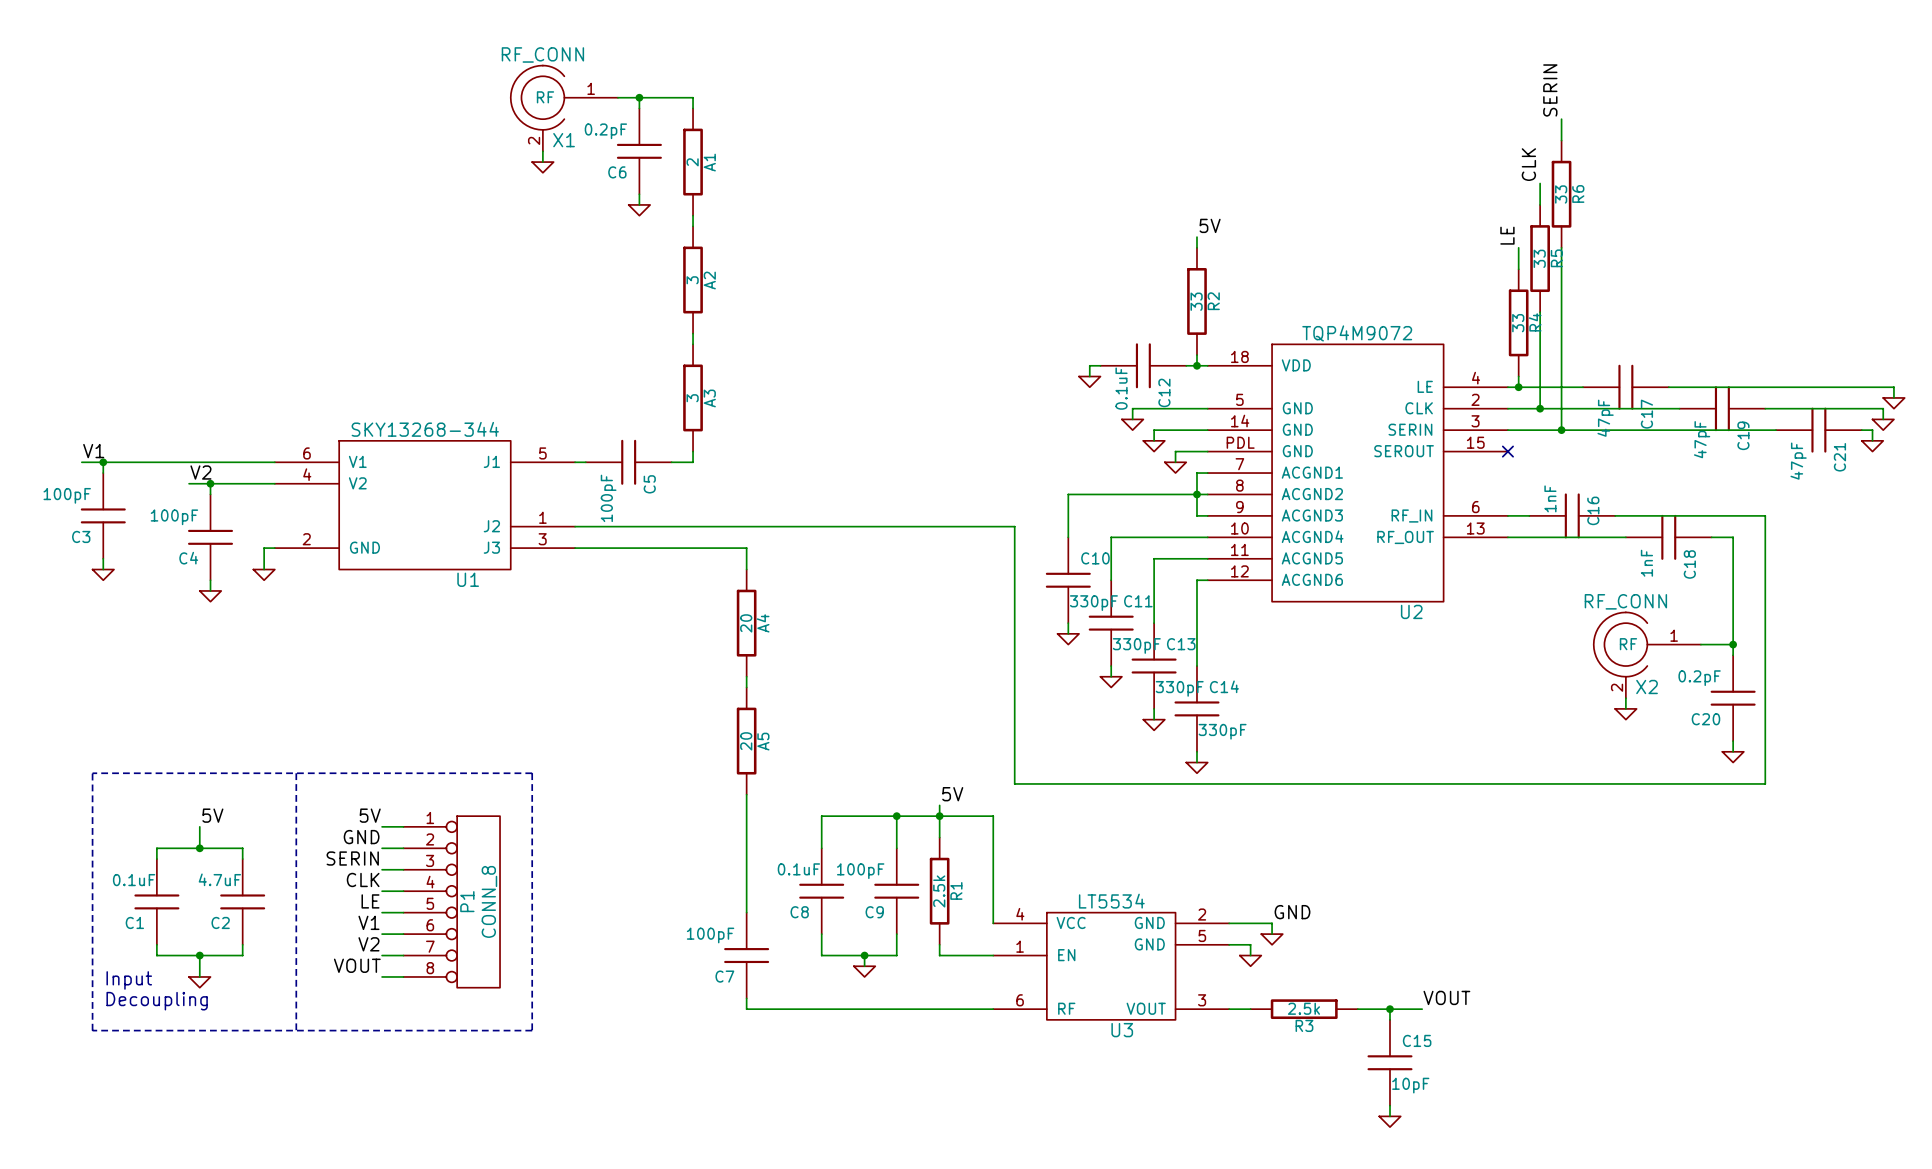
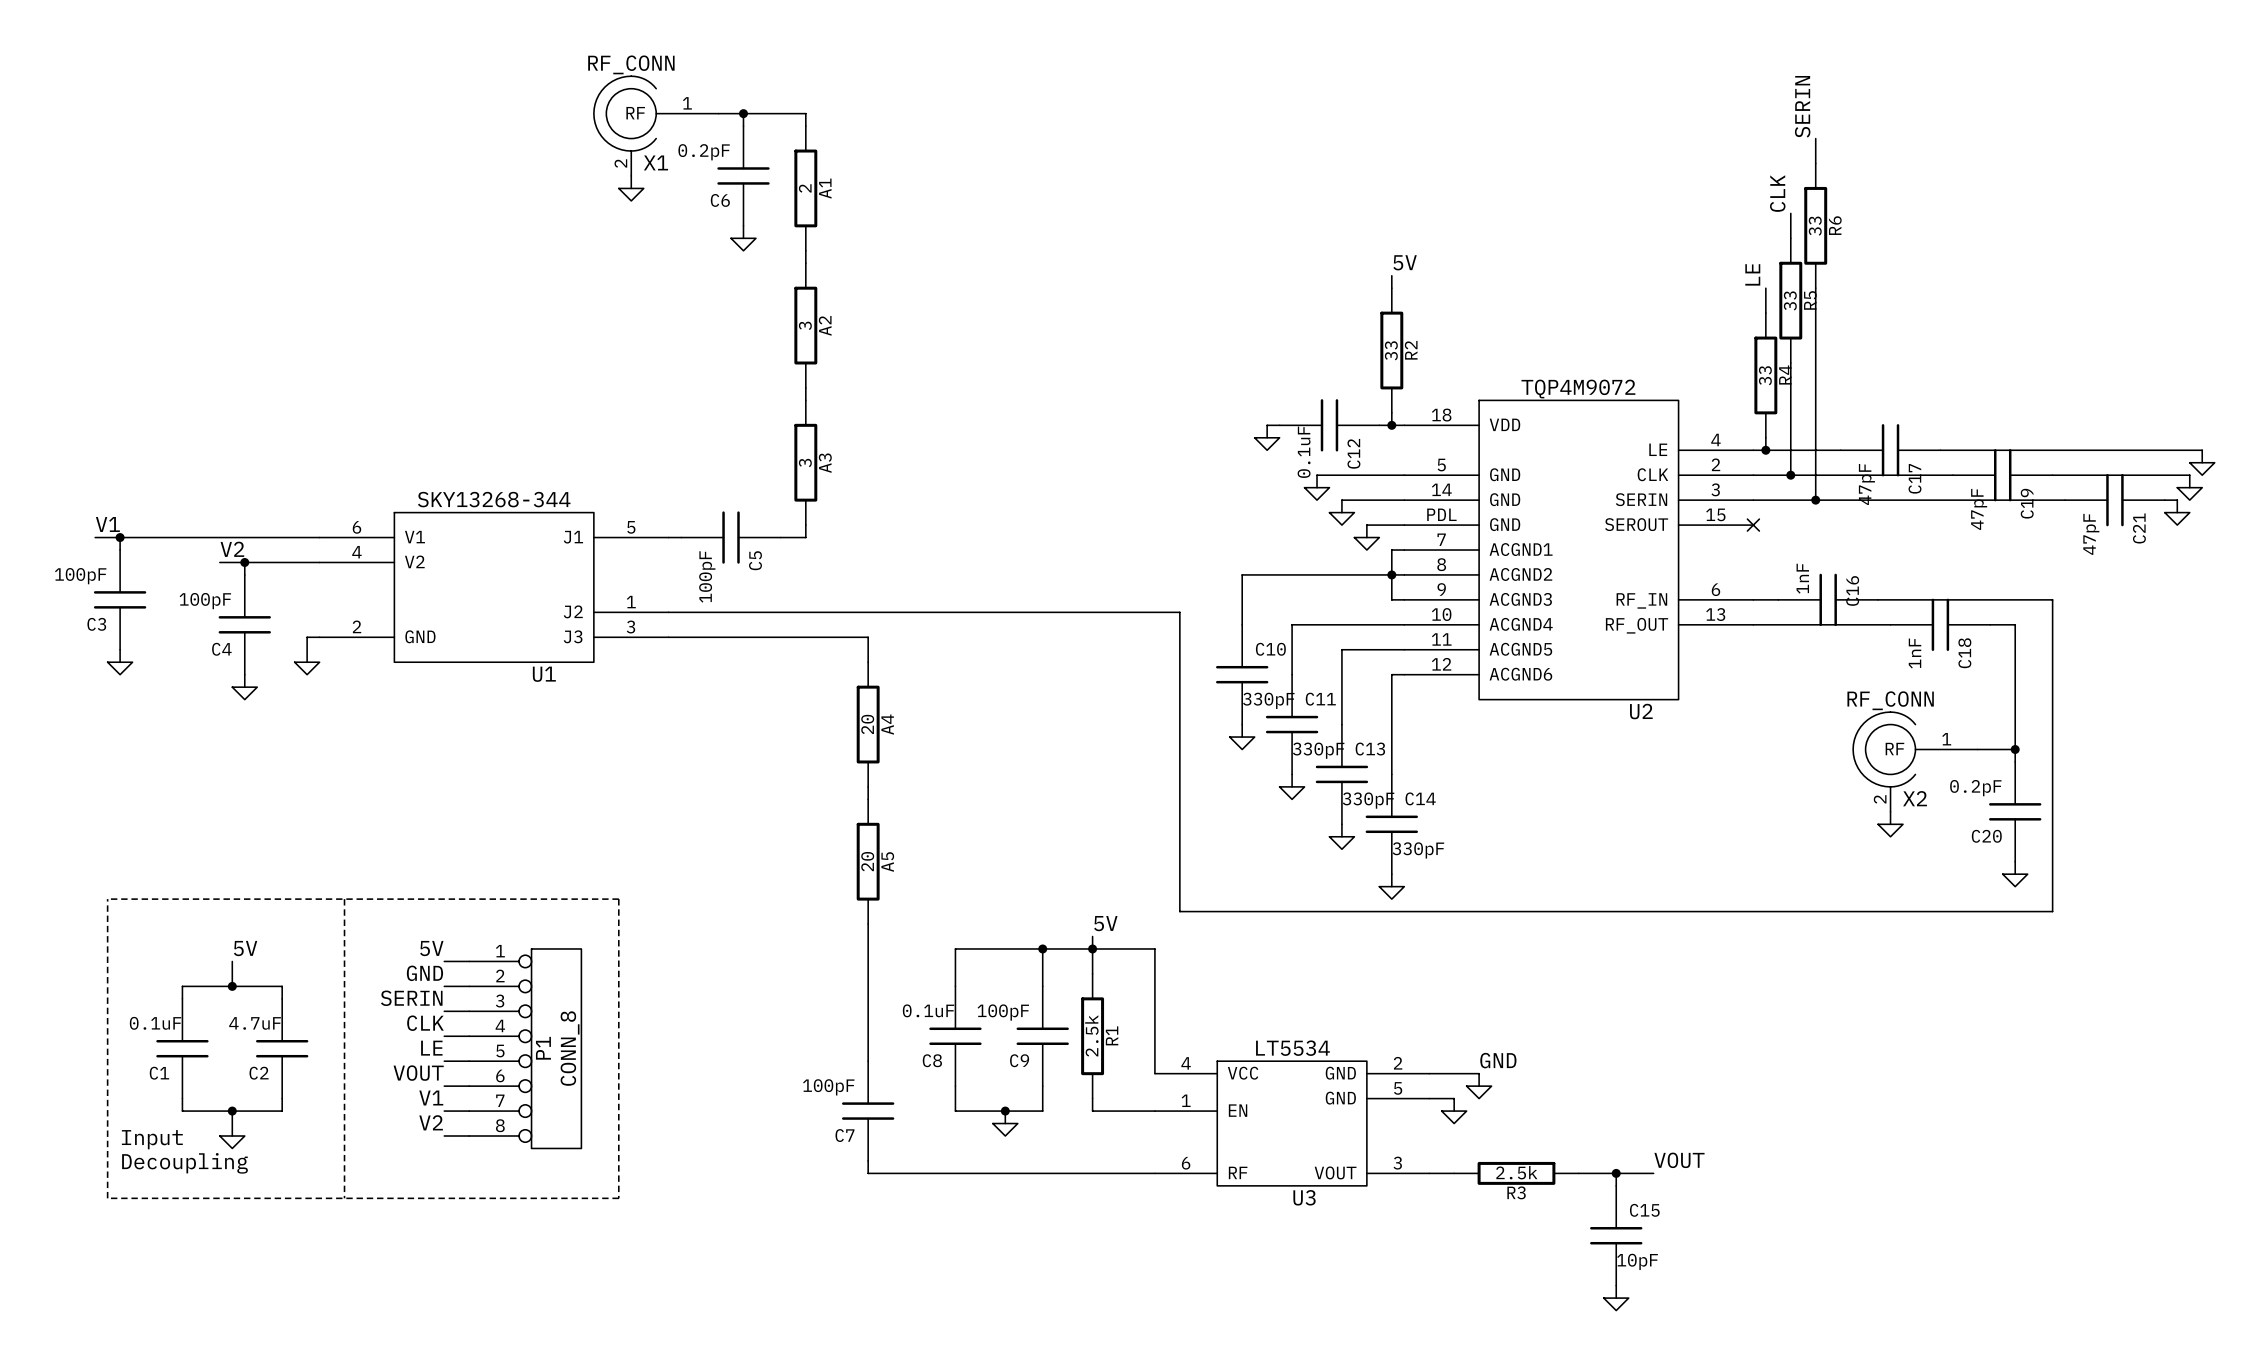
label: V1 (368, 922) -> VOUT (418, 1073)
label: V2 (368, 944) -> V1 (431, 1098)
label: VOUT (357, 965) -> V2 (431, 1122)

